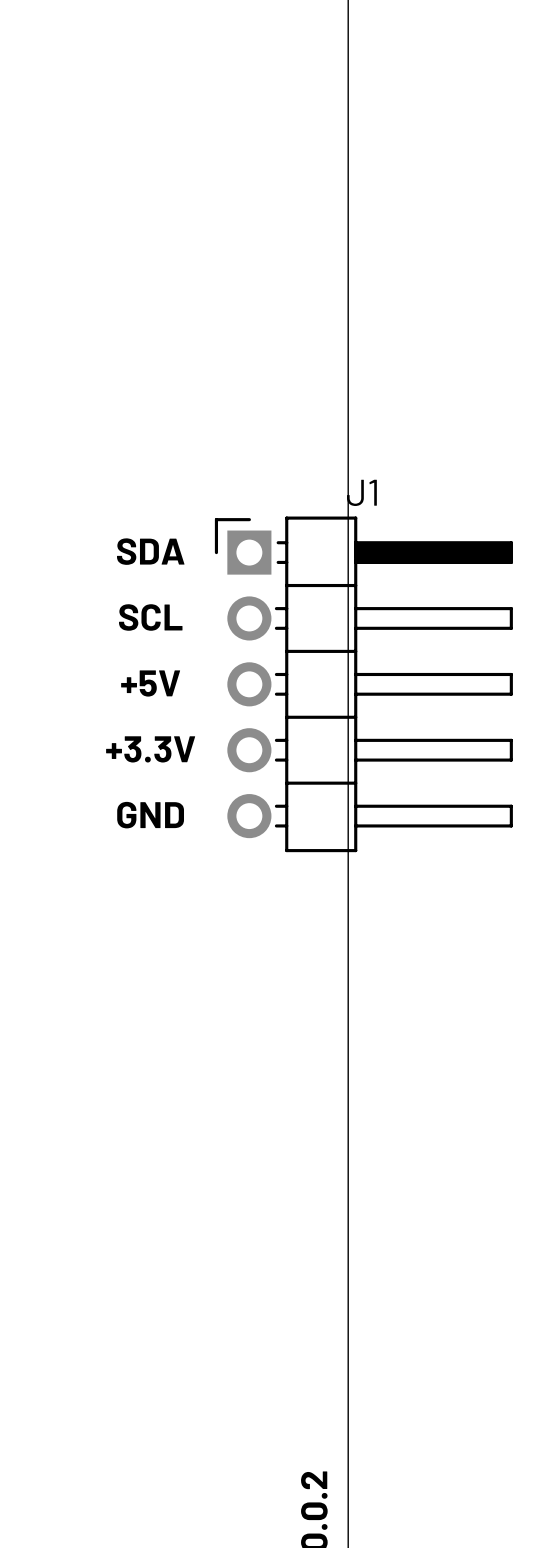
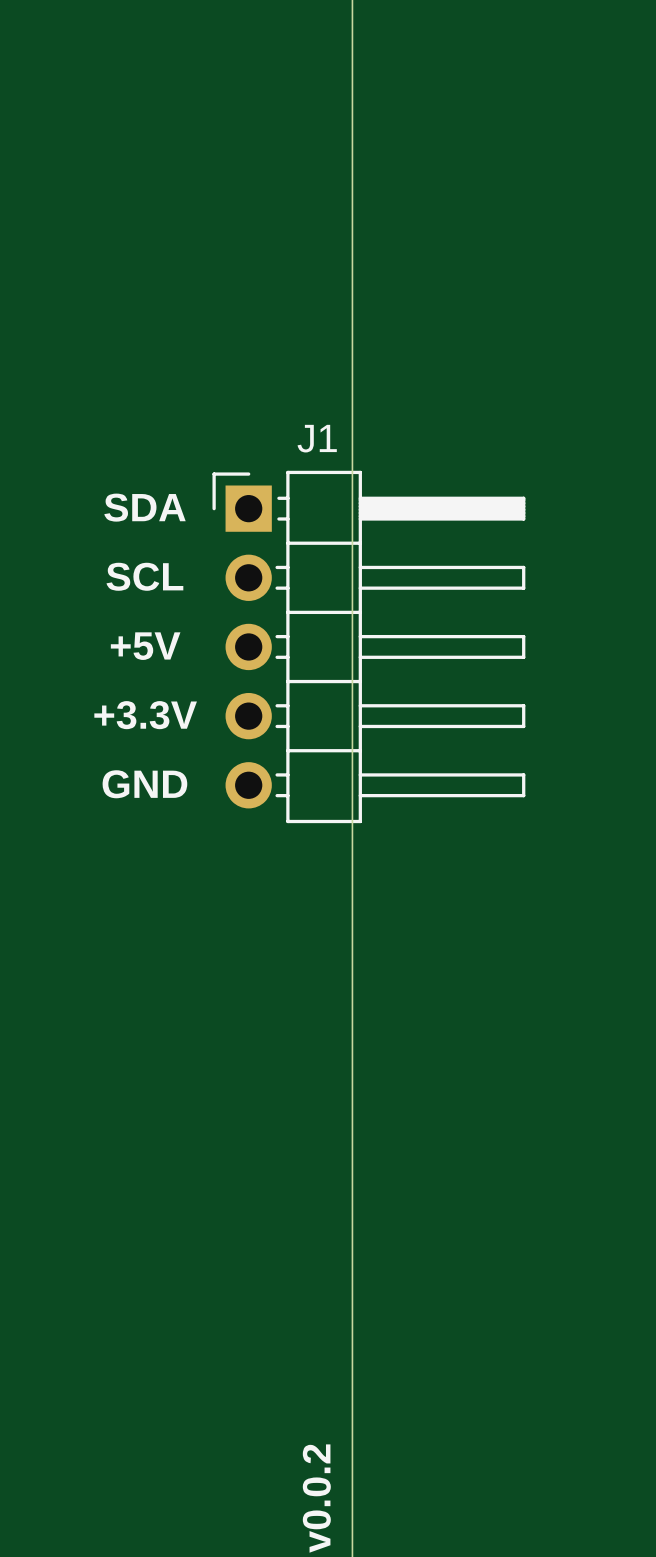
J1 name position: J1 (361, 492) -> J1 (317, 438)

